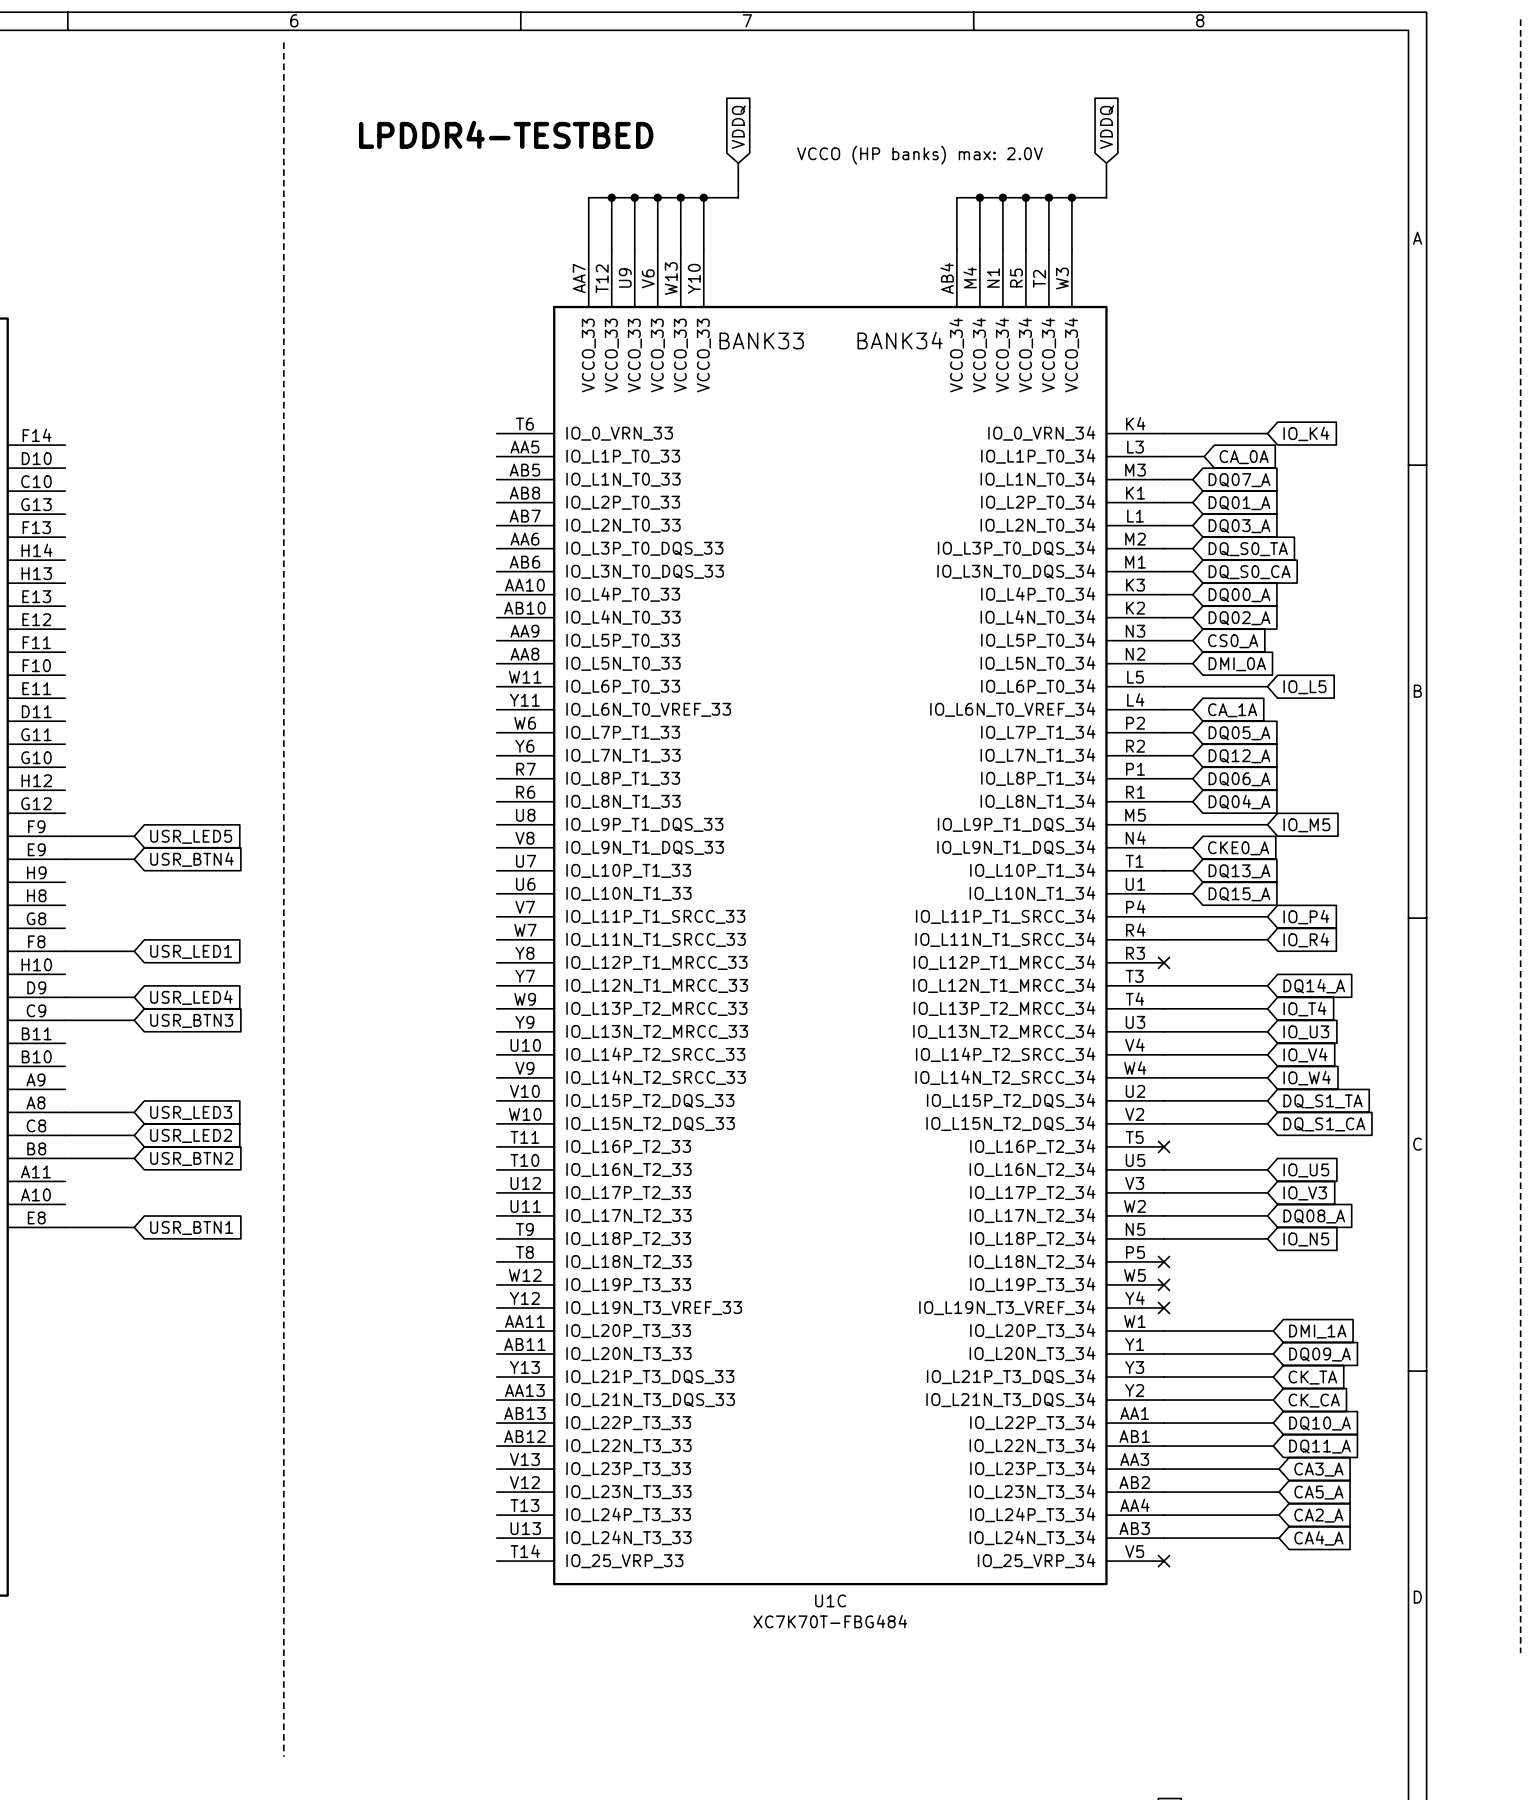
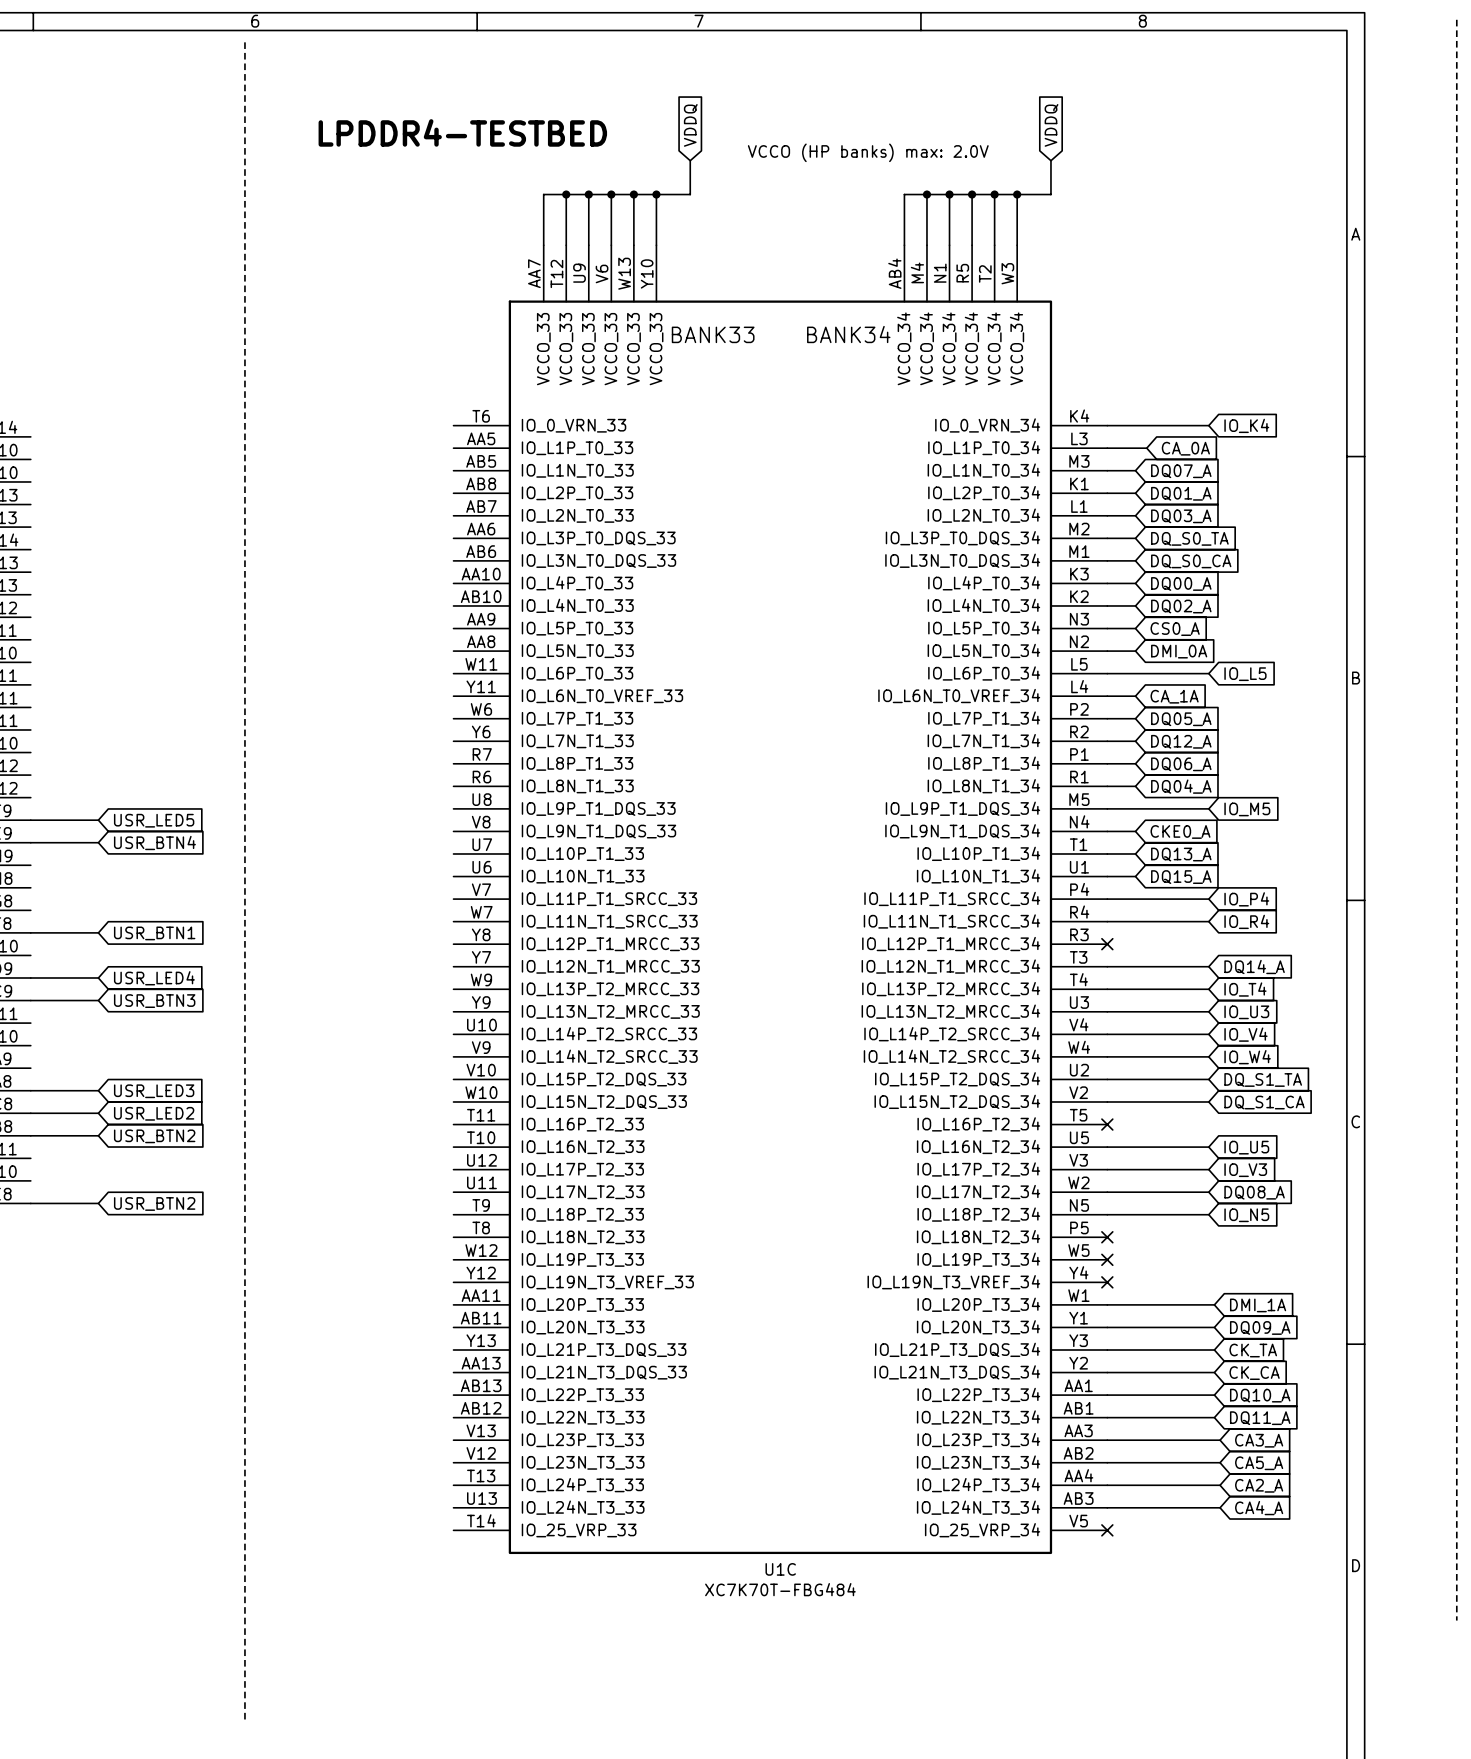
global label: USR_LED1 (191, 951) -> USR_BTN1 (154, 933)
global label: USR_BTN1 (191, 1227) -> USR_BTN2 (154, 1203)

